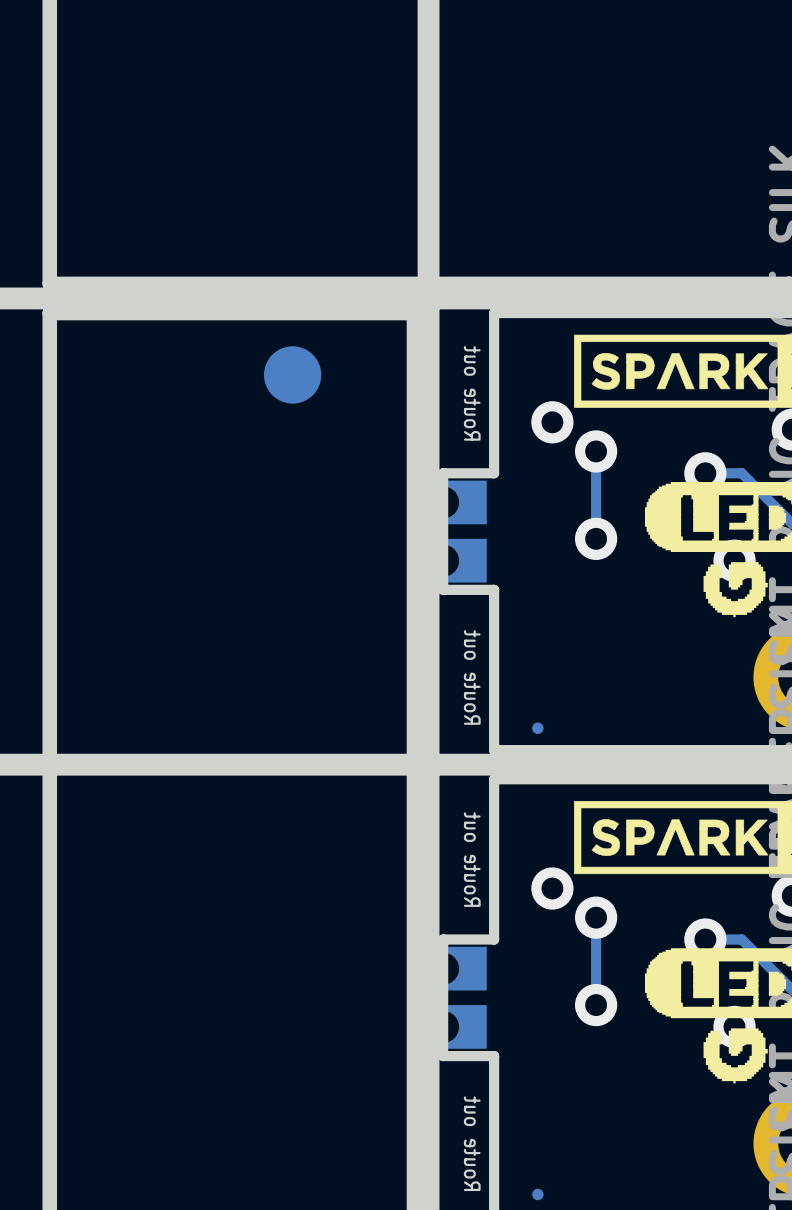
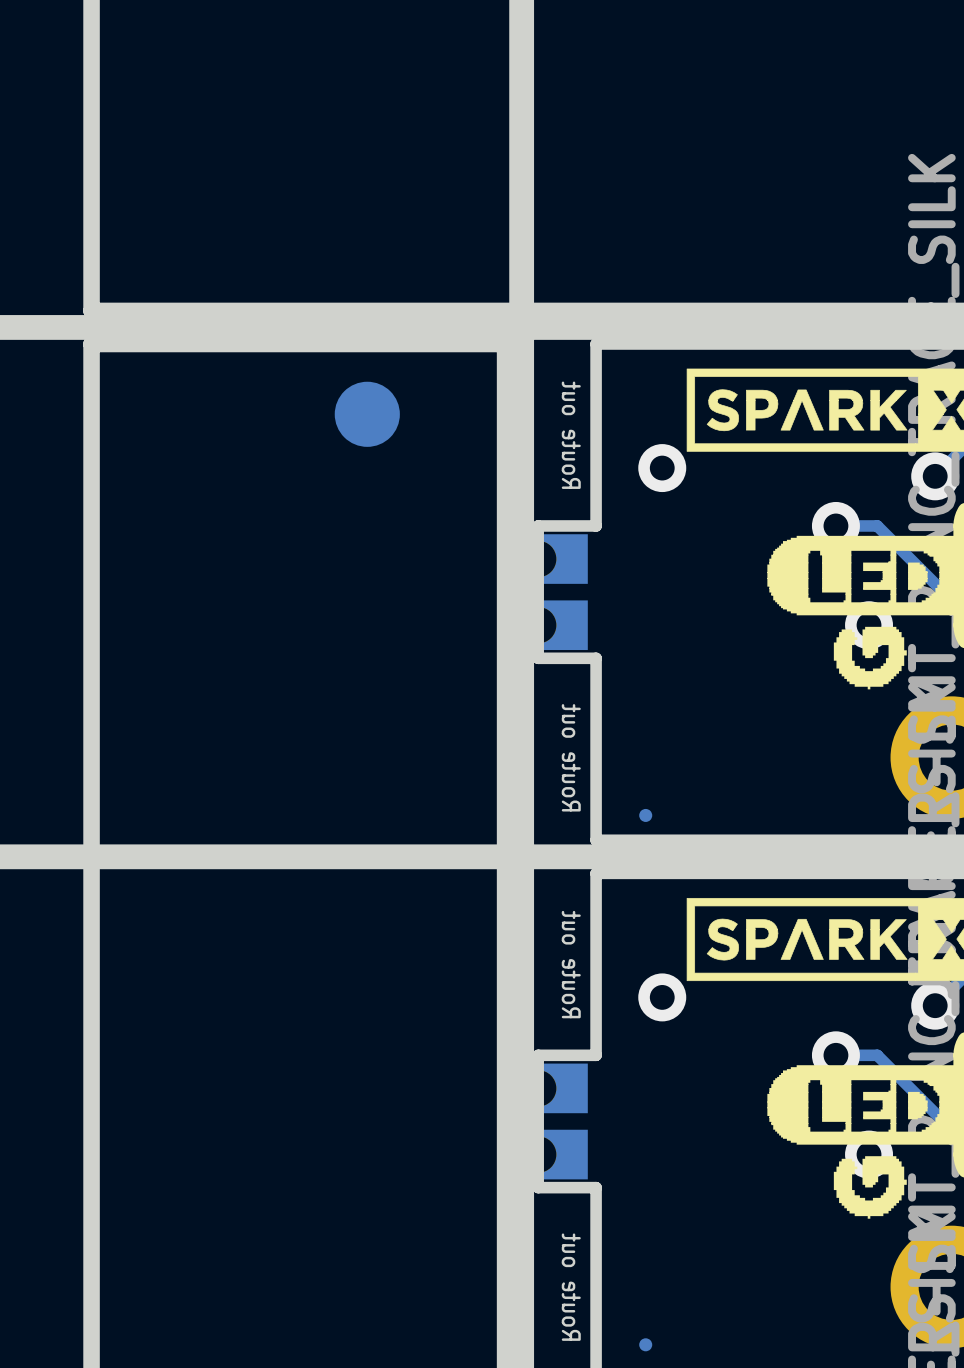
track: (596, 451) (596, 538) -> none
via: (596, 451) -> none
via: (596, 538) -> none
track: (596, 917) (596, 1005) -> none
via: (596, 917) -> none
via: (596, 1005) -> none

